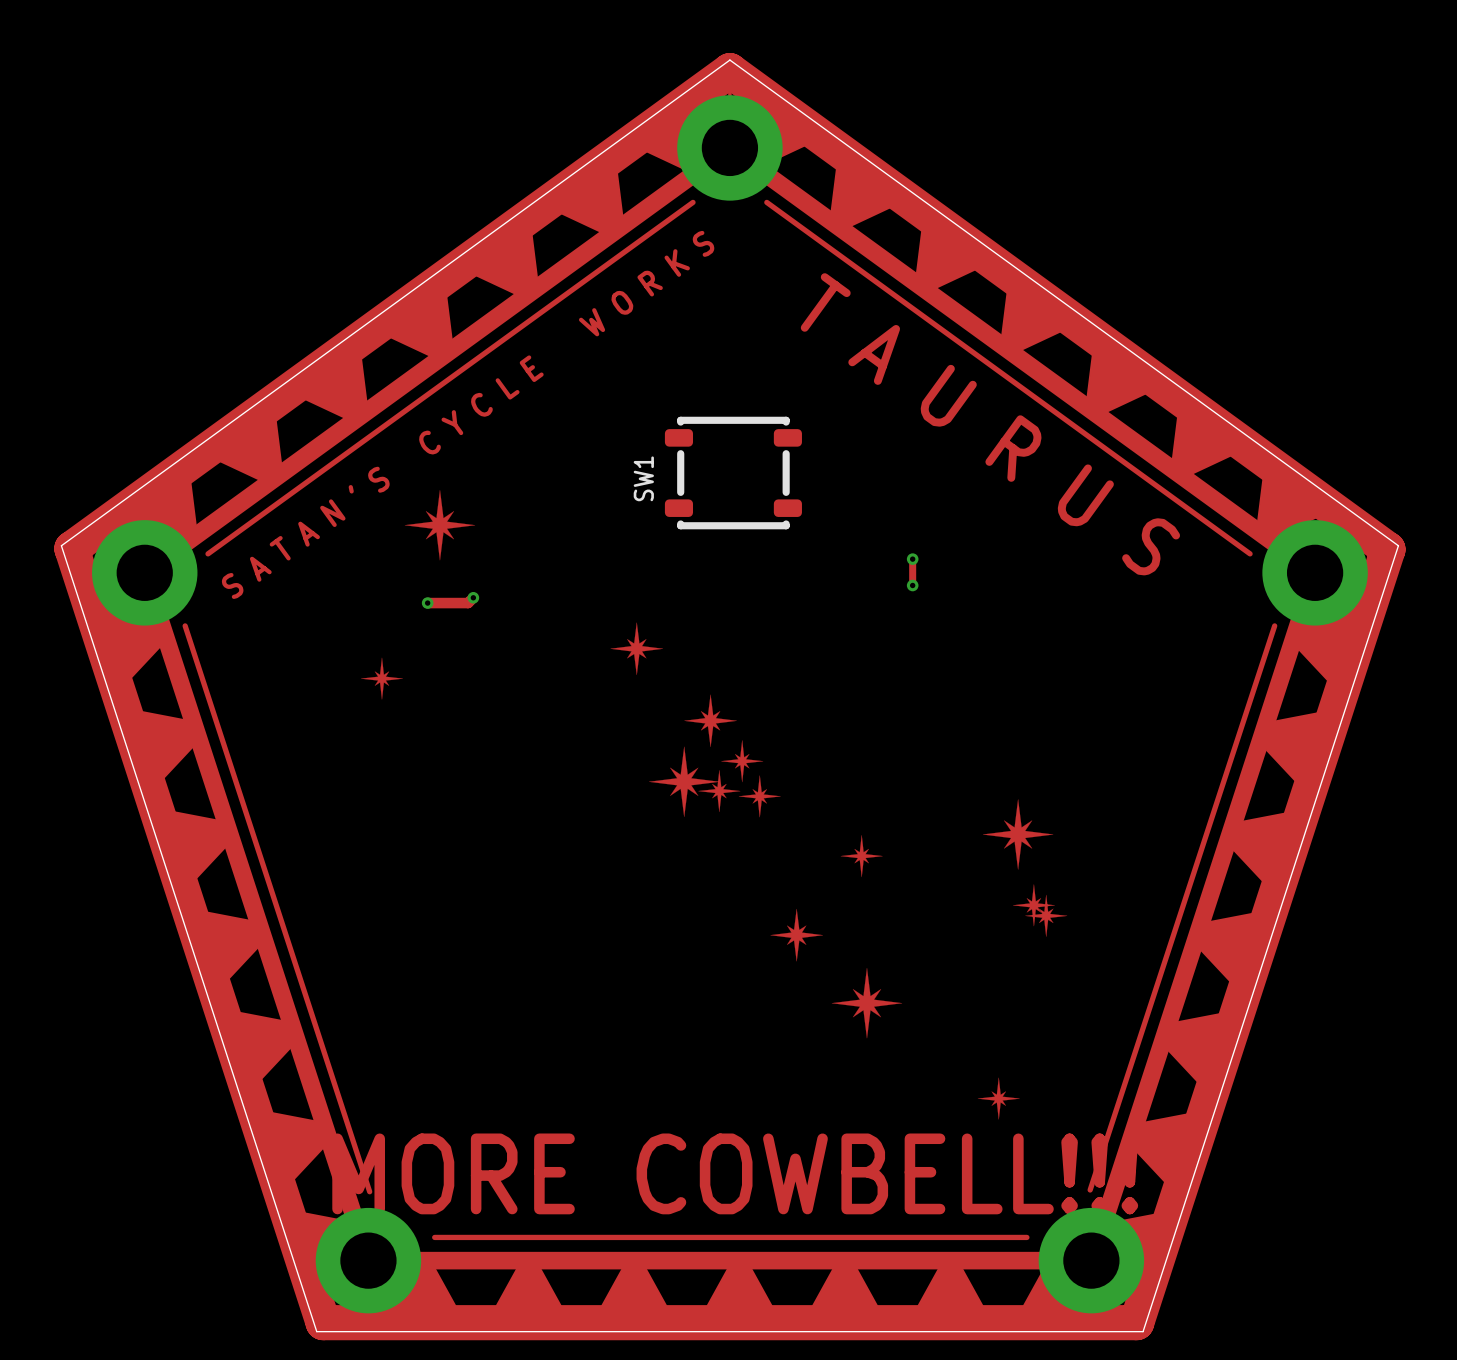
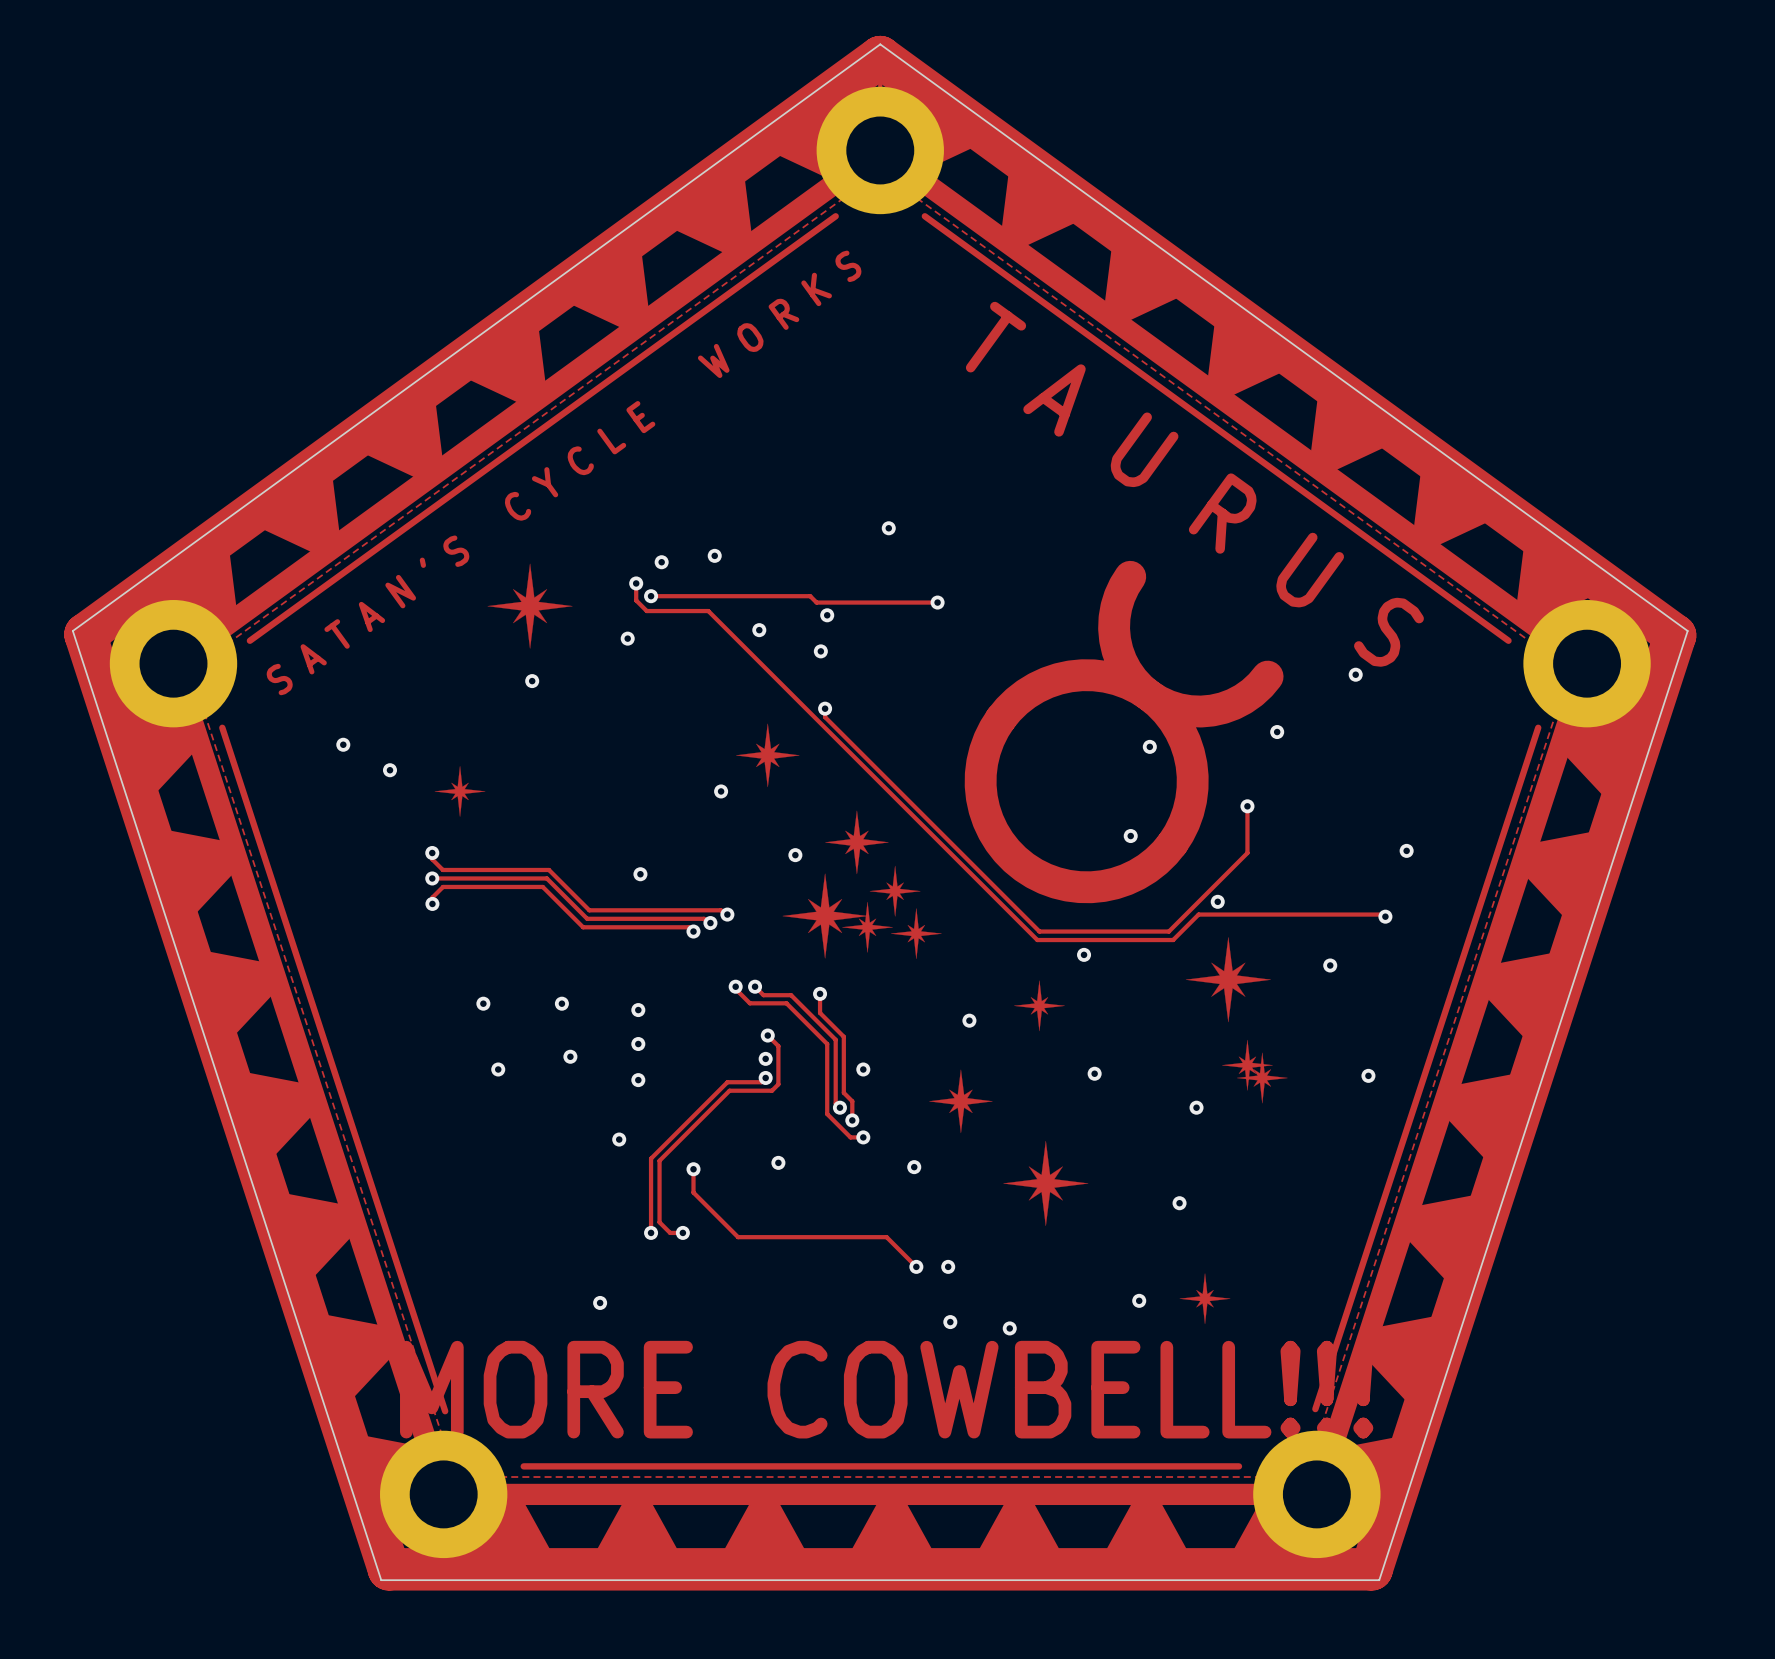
zone outline: none -> (880, 171) (1570, 670) (1304, 1477) (455, 1477) (190, 670) (880, 171)
via: none -> (888, 528)
SW1: (733, 473) -> none
via: none -> (714, 555)
drawing: none -> [964, 560, 1284, 904]
via: none -> (661, 562)
track: none -> (636, 583) (636, 600) (646, 611) (708, 611) (1037, 940) (1173, 940) (1198, 914) (1383, 914) (1385, 916)
via: none -> (636, 583)
track: none -> (651, 596) (810, 596) (816, 602) (937, 602)
via: none -> (651, 596)
via: none -> (937, 602)
via: none -> (827, 615)
via: none -> (759, 630)
via: none -> (627, 638)
track: (912, 559) (912, 585) -> none
via: (912, 559) -> none
via: none -> (820, 651)
via: none -> (1355, 674)
via: (912, 585) -> none
via: none -> (532, 681)
track: (473, 597) (468, 603) (427, 603) -> none
via: (473, 597) -> none
via: (427, 603) -> none
track: none -> (825, 708) (825, 717) (1039, 931) (1168, 931) (1247, 853) (1247, 806)
via: none -> (825, 708)
via: none -> (1277, 732)
via: none -> (343, 744)
via: none -> (1149, 746)
via: none -> (389, 770)
via: none -> (721, 791)
via: none -> (1247, 806)
via: none -> (1130, 836)
via: none -> (1406, 850)
track: none -> (432, 853) (432, 859) (442, 869) (549, 869) (589, 910) (721, 910) (727, 914)
via: none -> (432, 853)
via: none -> (795, 855)
via: none -> (640, 874)
track: none -> (432, 878) (546, 878) (587, 918) (704, 918) (710, 923)
via: none -> (432, 878)
via: none -> (1217, 901)
track: none -> (432, 903) (432, 897) (443, 886) (542, 886) (583, 927) (689, 927) (693, 931)
via: none -> (432, 903)
via: none -> (727, 914)
via: none -> (1385, 916)
via: none -> (710, 923)
via: none -> (693, 931)
via: none -> (1084, 954)
via: none -> (1330, 965)
track: none -> (735, 986) (735, 989) (749, 1003) (786, 1003) (827, 1044) (827, 1114) (850, 1137) (863, 1137)
via: none -> (735, 986)
track: none -> (755, 986) (763, 995) (791, 995) (835, 1039) (835, 1103) (839, 1107)
via: none -> (755, 986)
track: none -> (820, 993) (820, 1012) (843, 1036) (843, 1092) (852, 1101) (852, 1120)
via: none -> (820, 993)
via: none -> (483, 1003)
via: none -> (561, 1003)
via: none -> (638, 1010)
via: none -> (969, 1020)
track: none -> (767, 1035) (778, 1046) (778, 1084) (772, 1090) (729, 1090) (659, 1160) (659, 1222) (670, 1232) (682, 1232)
via: none -> (767, 1035)
via: none -> (638, 1044)
via: none -> (570, 1056)
via: none -> (765, 1058)
via: none -> (498, 1069)
via: none -> (863, 1069)
via: none -> (1094, 1073)
via: none -> (1368, 1075)
track: none -> (765, 1077) (761, 1082) (727, 1082) (651, 1158) (651, 1232)
via: none -> (765, 1077)
via: none -> (638, 1080)
via: none -> (839, 1107)
via: none -> (1196, 1107)
via: none -> (852, 1120)
via: none -> (863, 1137)
via: none -> (619, 1139)
via: none -> (778, 1162)
via: none -> (914, 1167)
track: none -> (693, 1169) (693, 1192) (738, 1237) (886, 1237) (916, 1266)
via: none -> (693, 1169)
via: none -> (1179, 1203)
via: none -> (651, 1232)
via: none -> (682, 1232)
via: none -> (916, 1266)
via: none -> (948, 1266)
via: none -> (1139, 1300)
via: none -> (600, 1302)
via: none -> (950, 1322)
via: none -> (1009, 1328)

